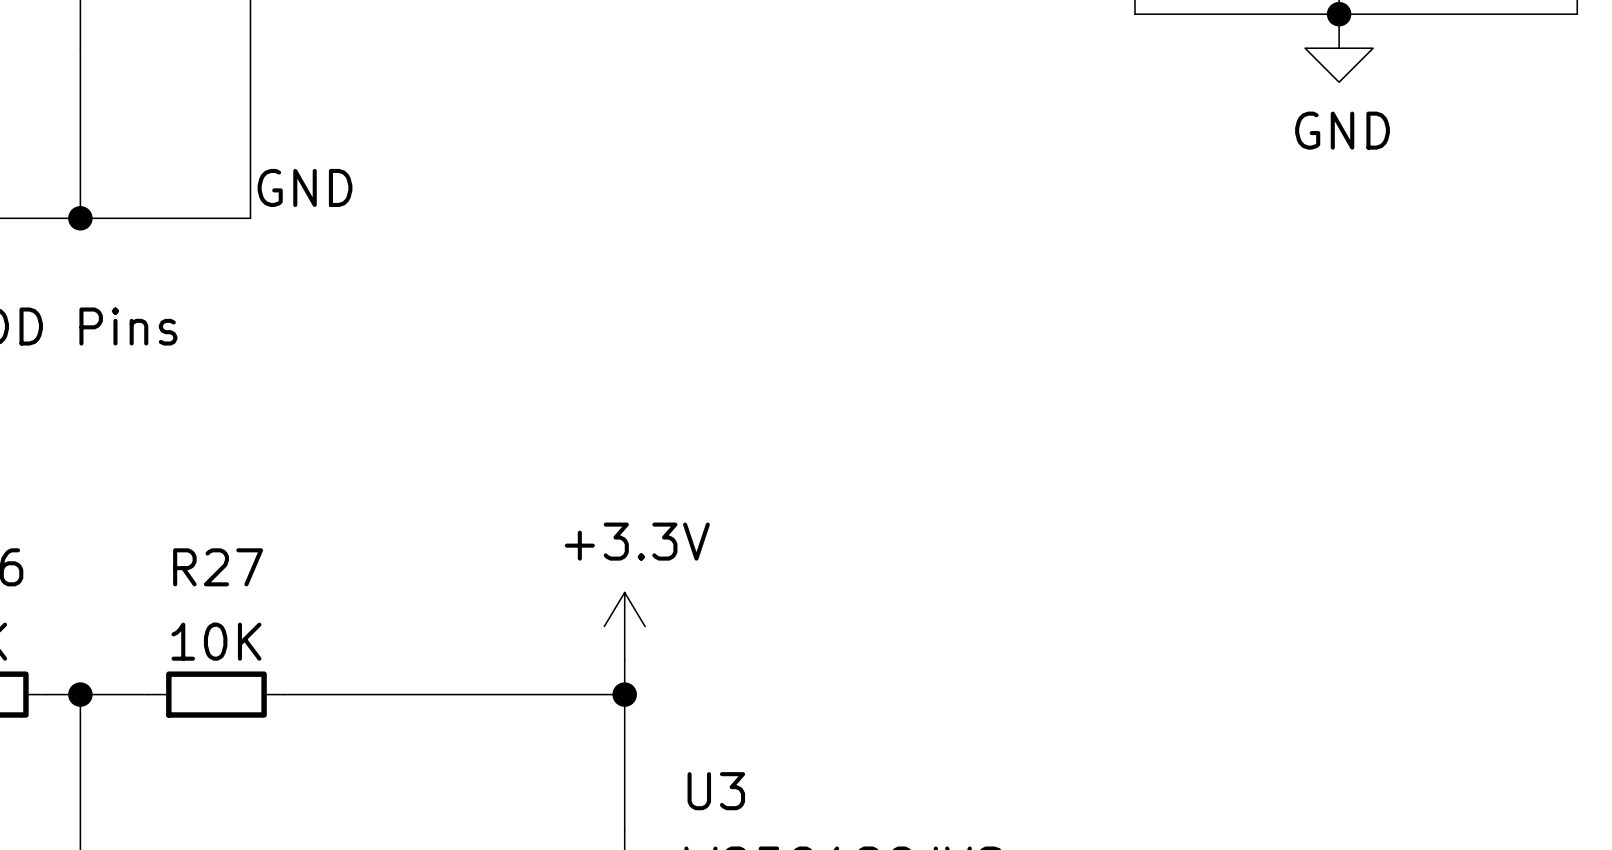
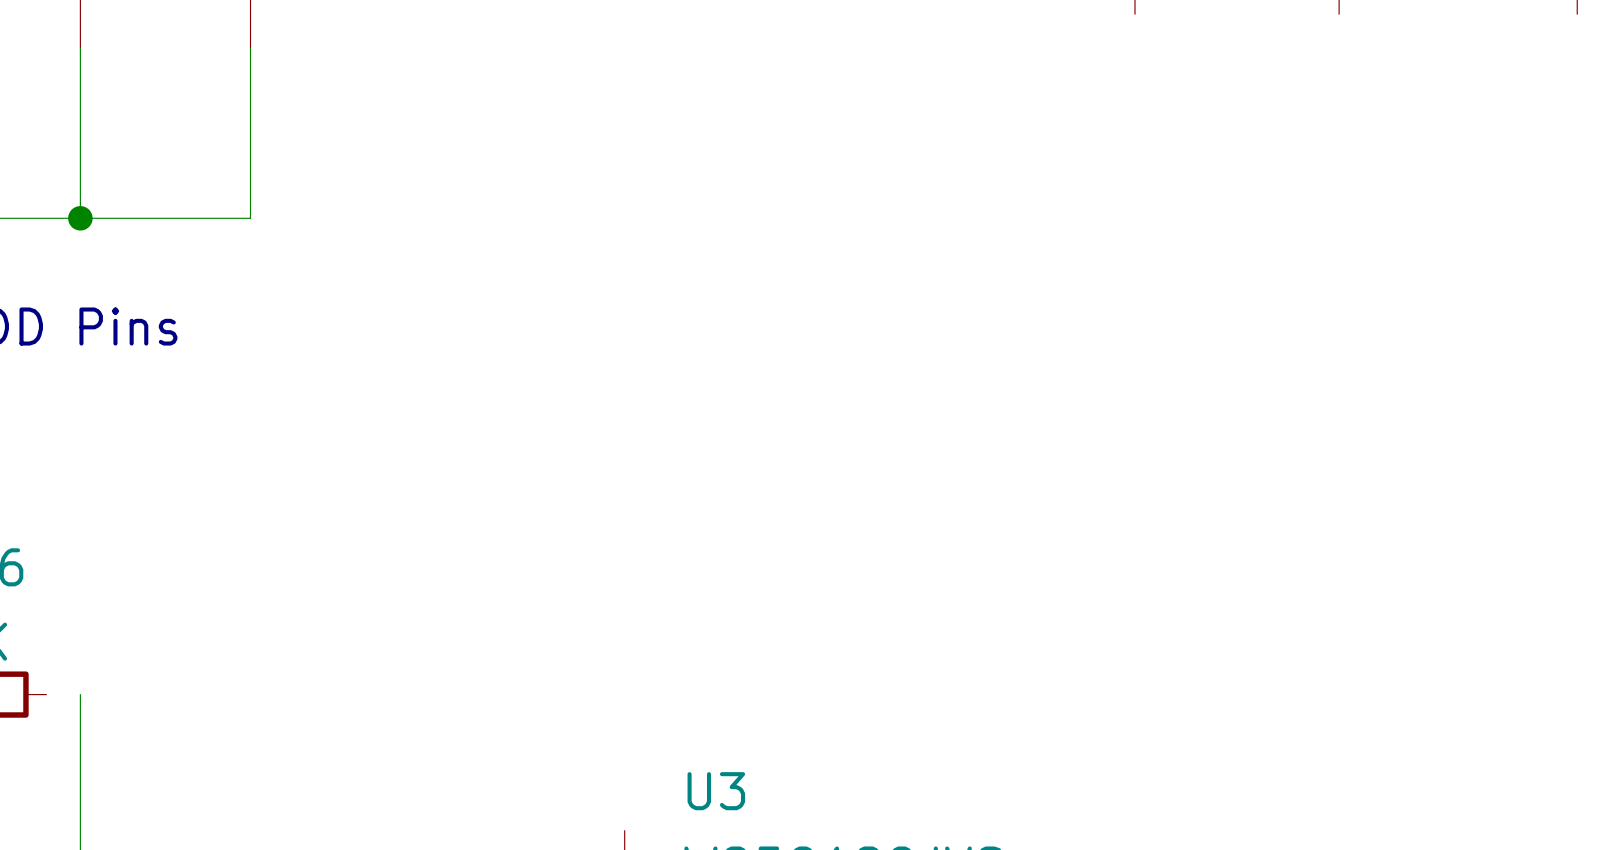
wire: (1134, 14) (1577, 14) -> none
junction: (1339, 14) -> none
power symbol: GND (1339, 48) -> none
label: GND (305, 187) -> none
power symbol: +3.3V (624, 626) -> none
wire: (624, 660) (624, 830) -> none
wire: (46, 694) (148, 694) -> none
junction: (80, 694) -> none
R27: 10K (216, 694) -> none
wire: (284, 694) (624, 694) -> none
junction: (624, 694) -> none

